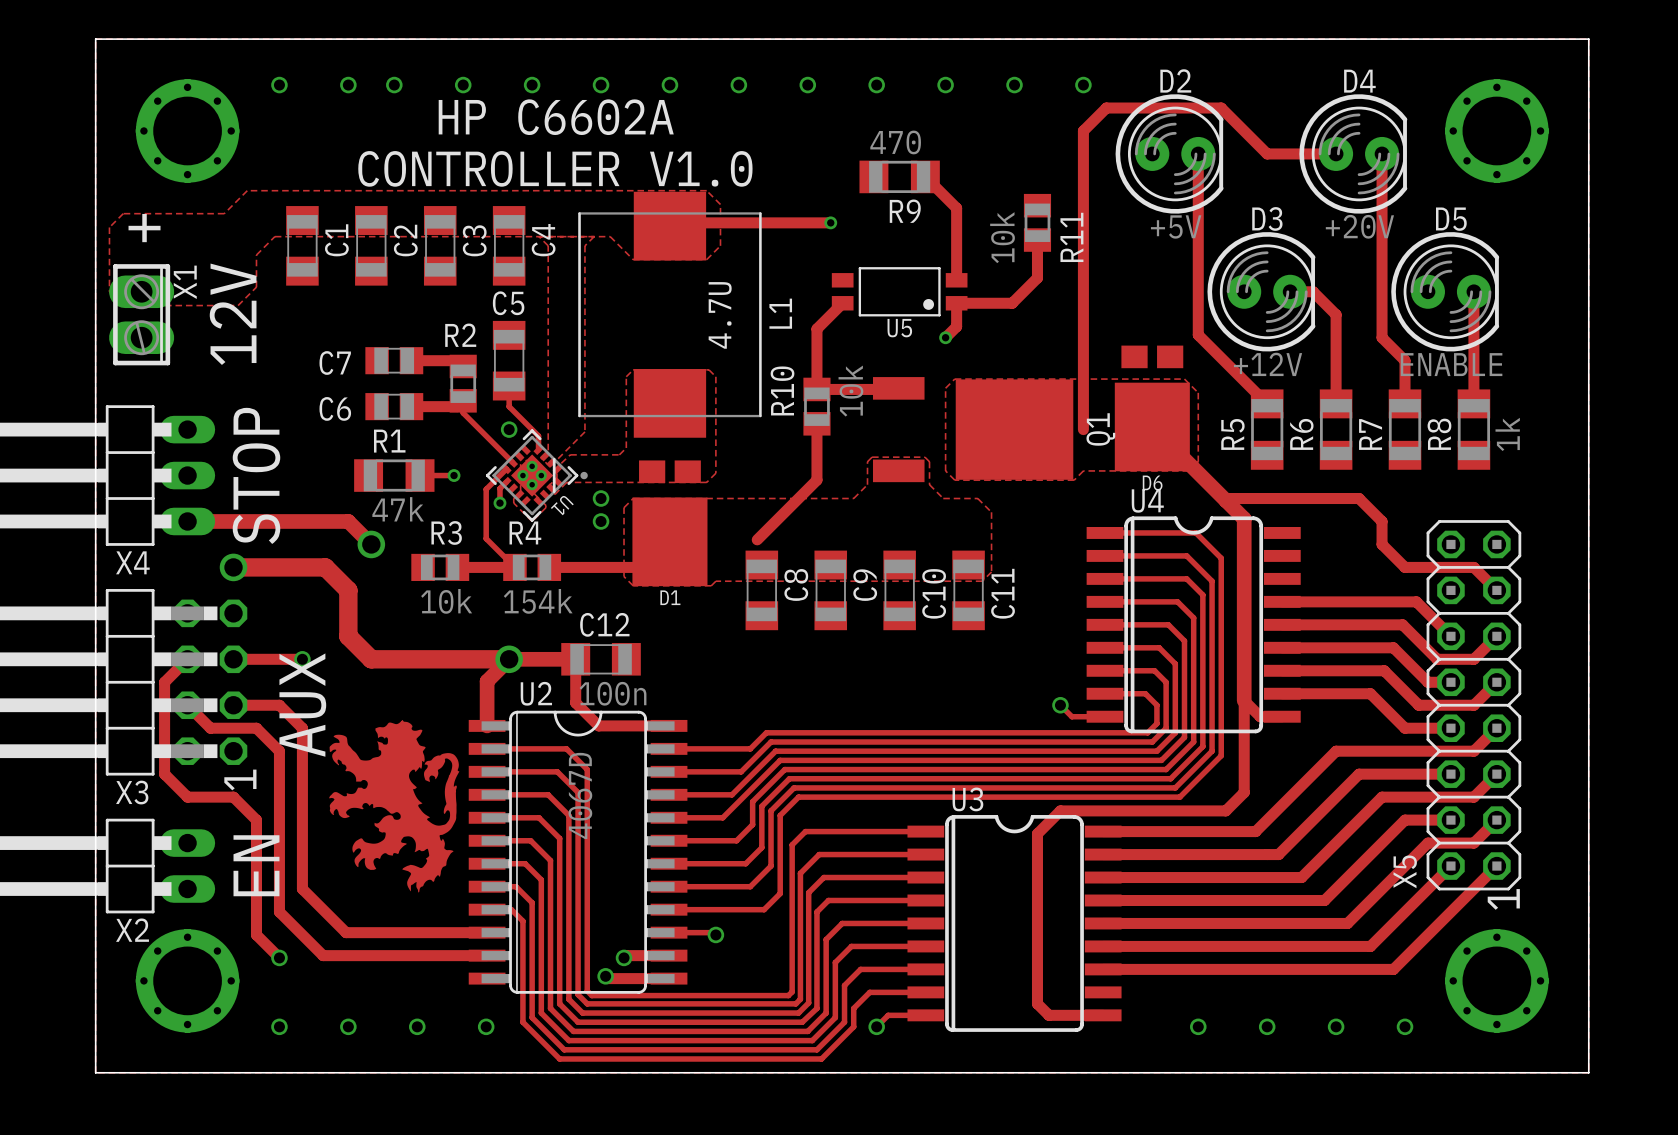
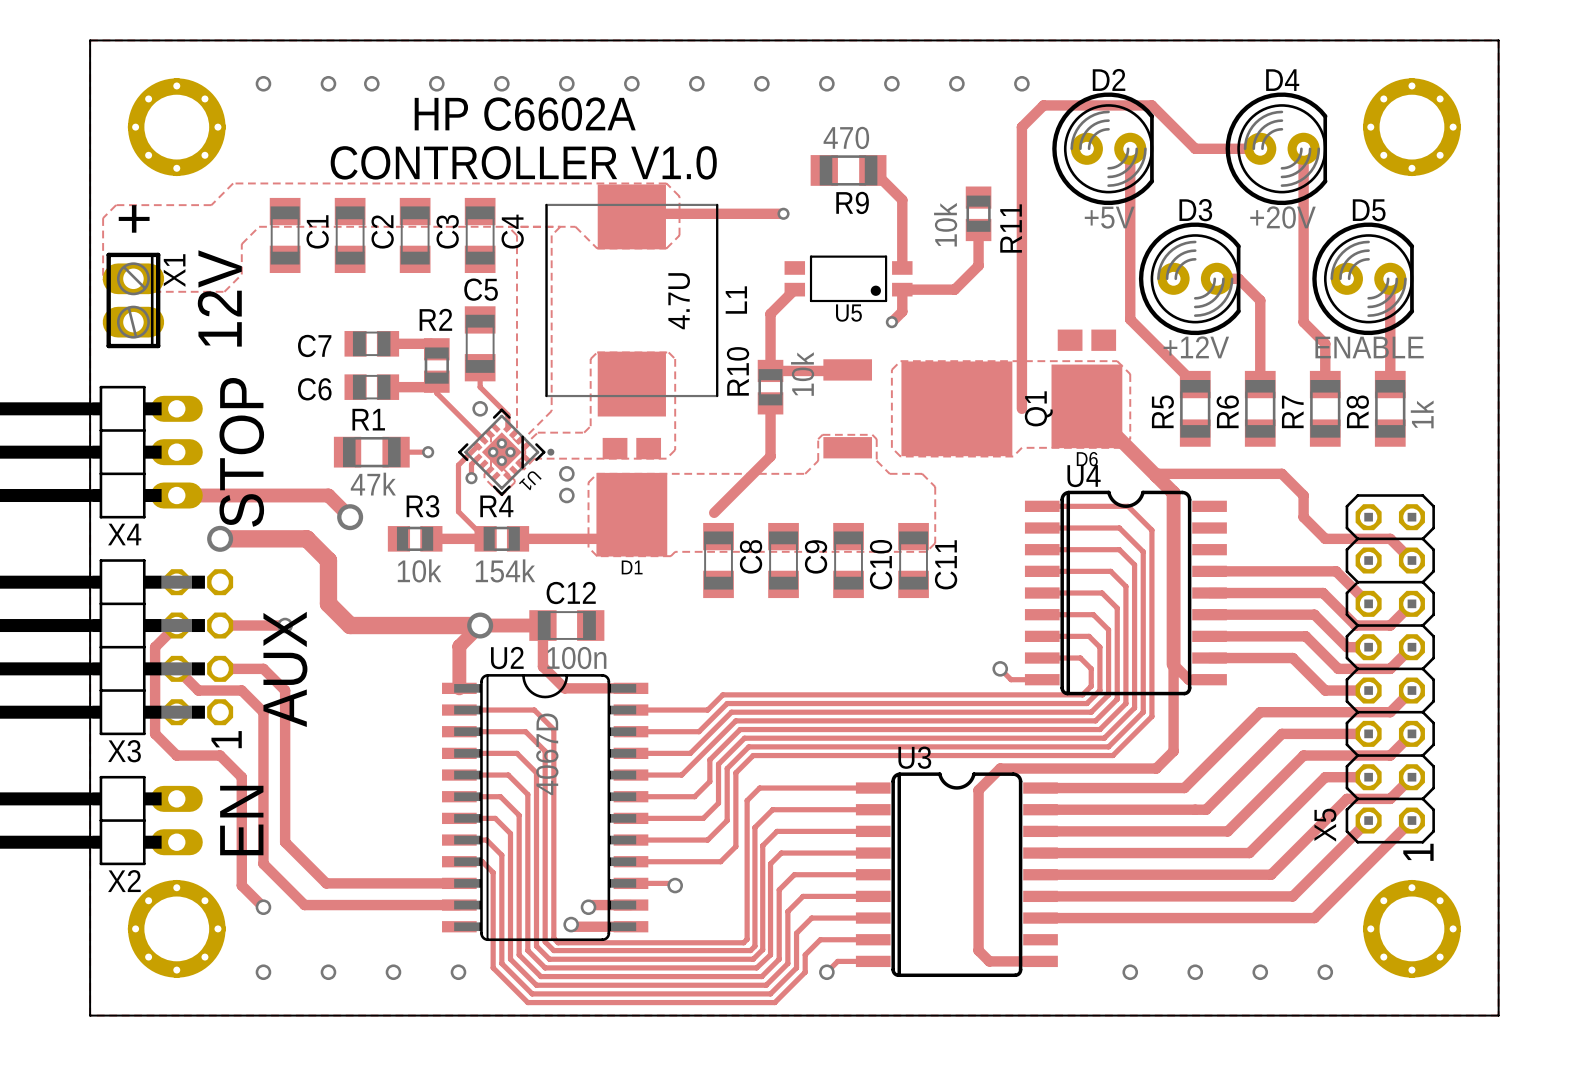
part: (394, 806) -> none

